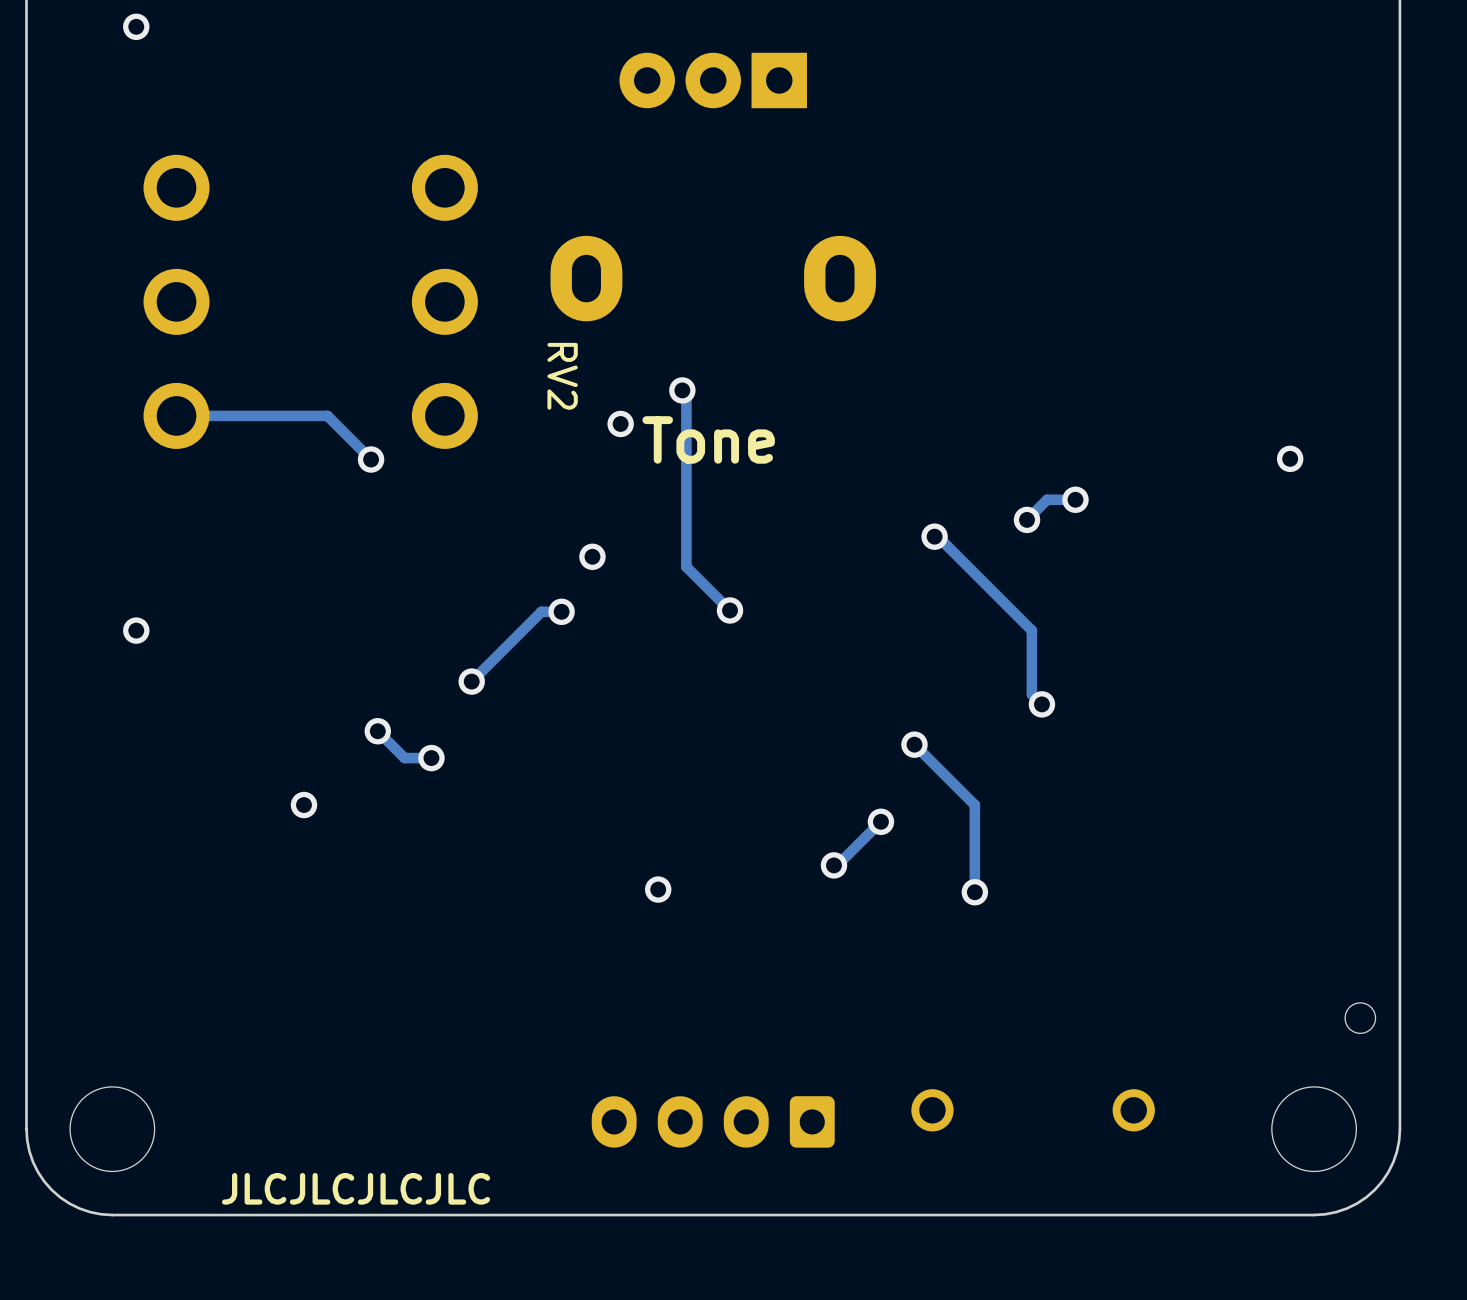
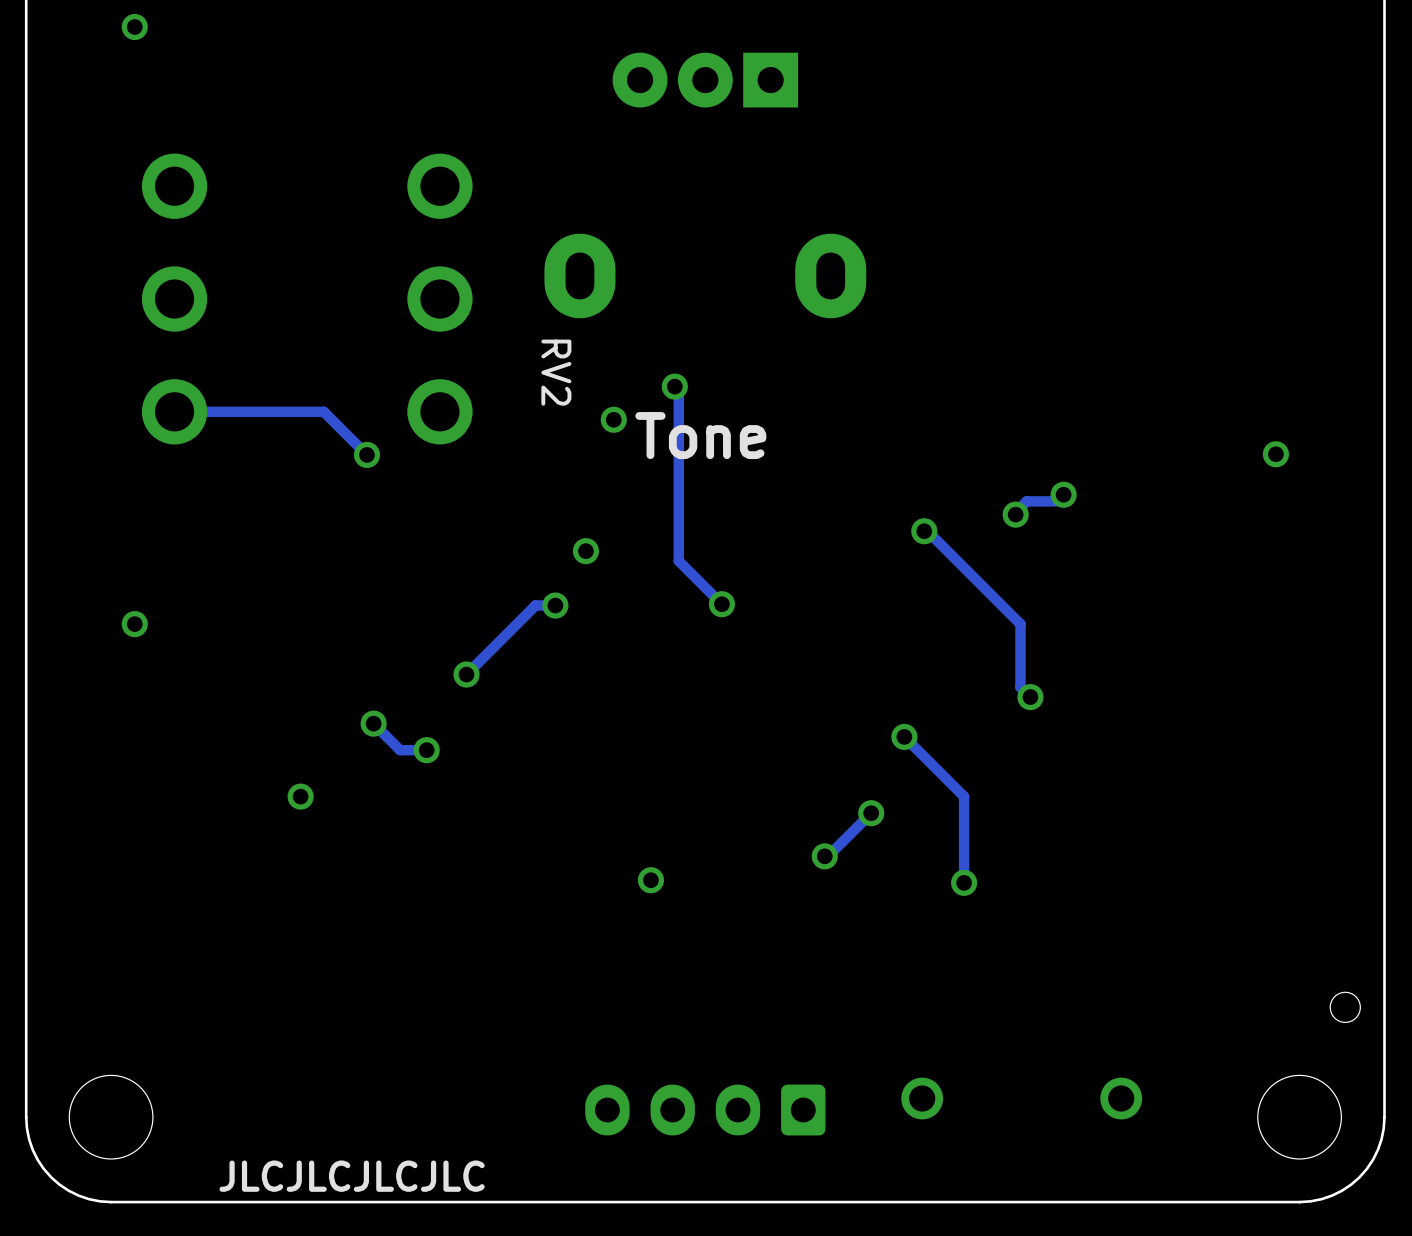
track: (1075, 499) (1047, 499) (1027, 519) -> none
track: none -> (1063, 501) (1026, 501) (1013, 514)

